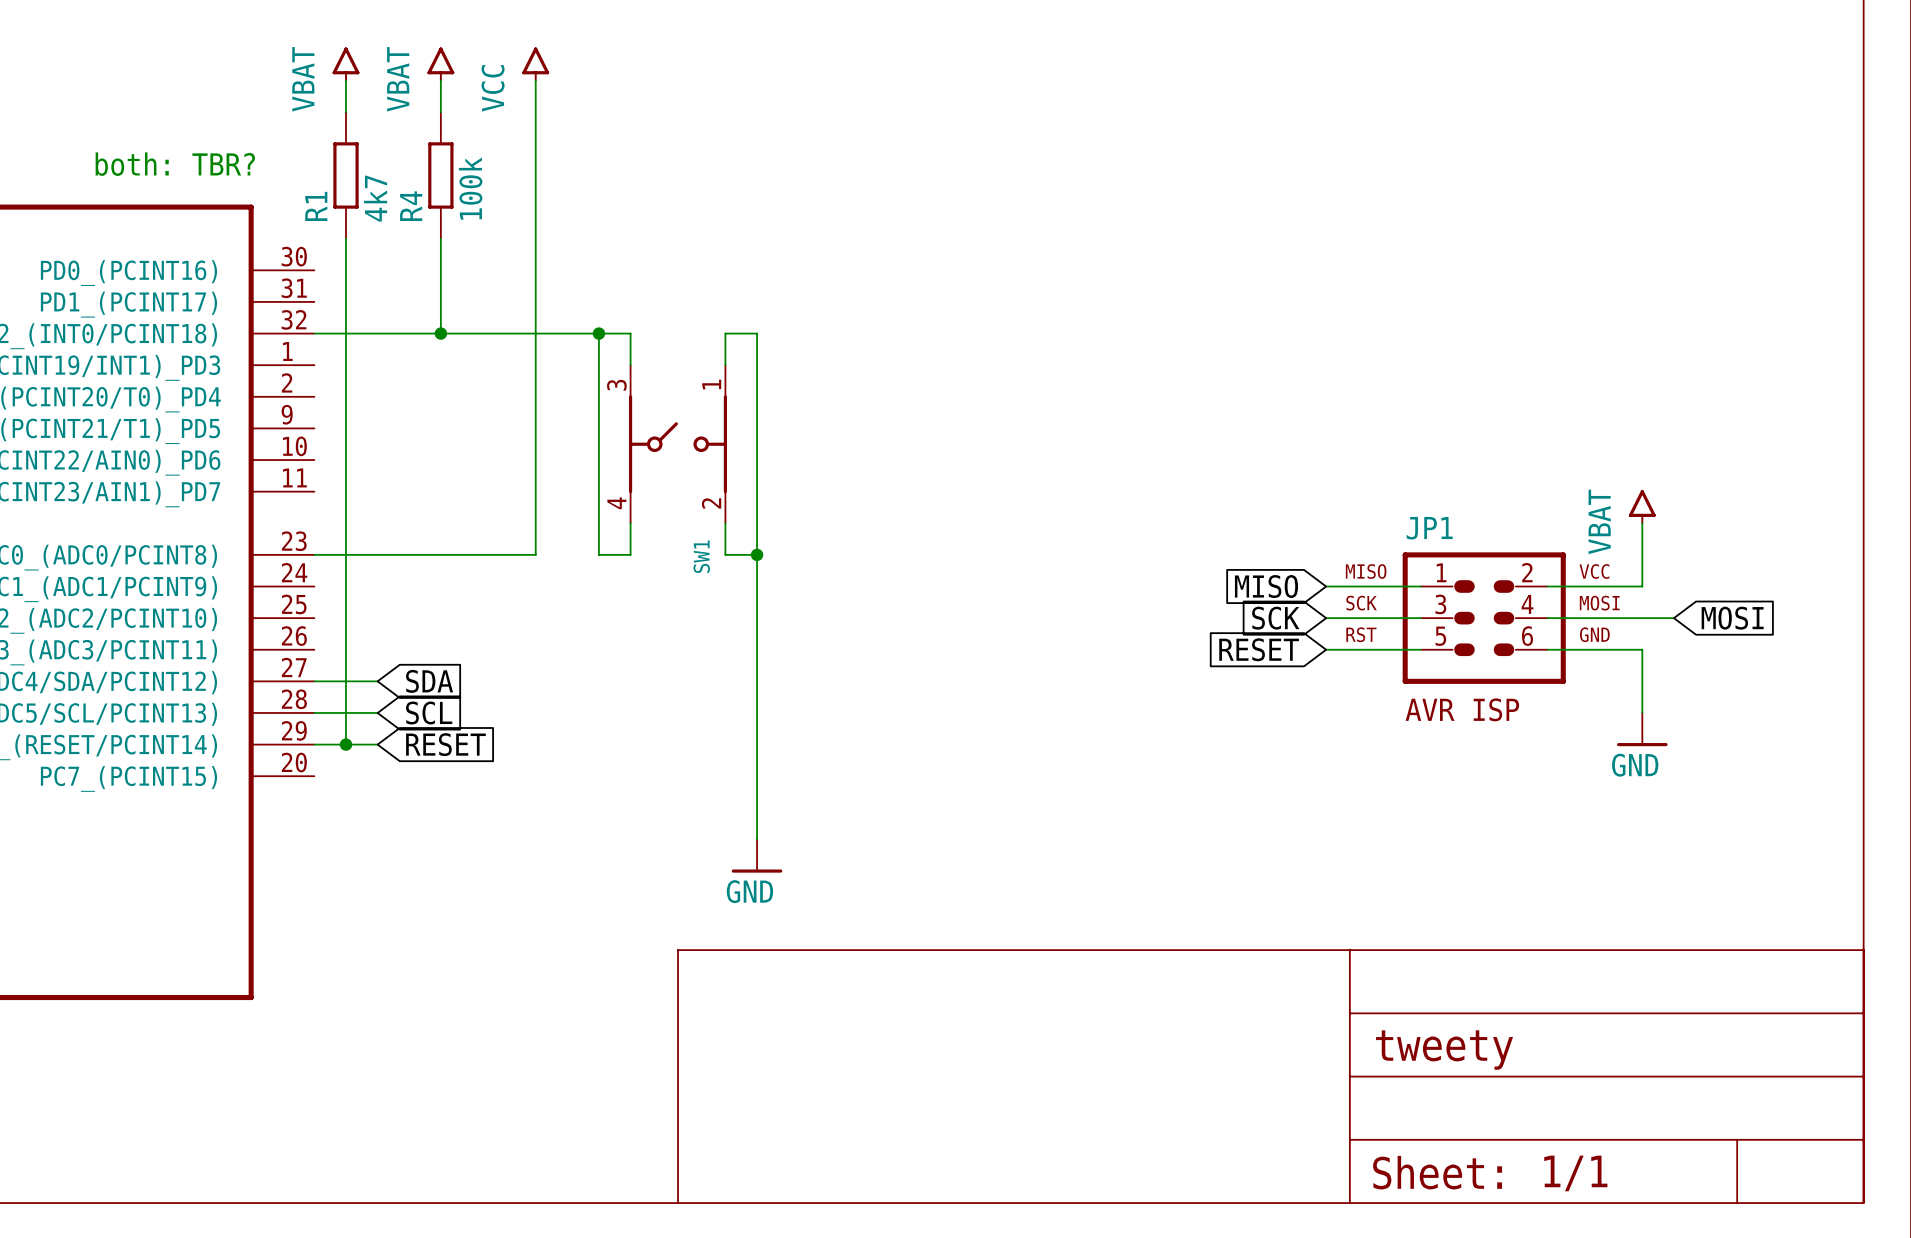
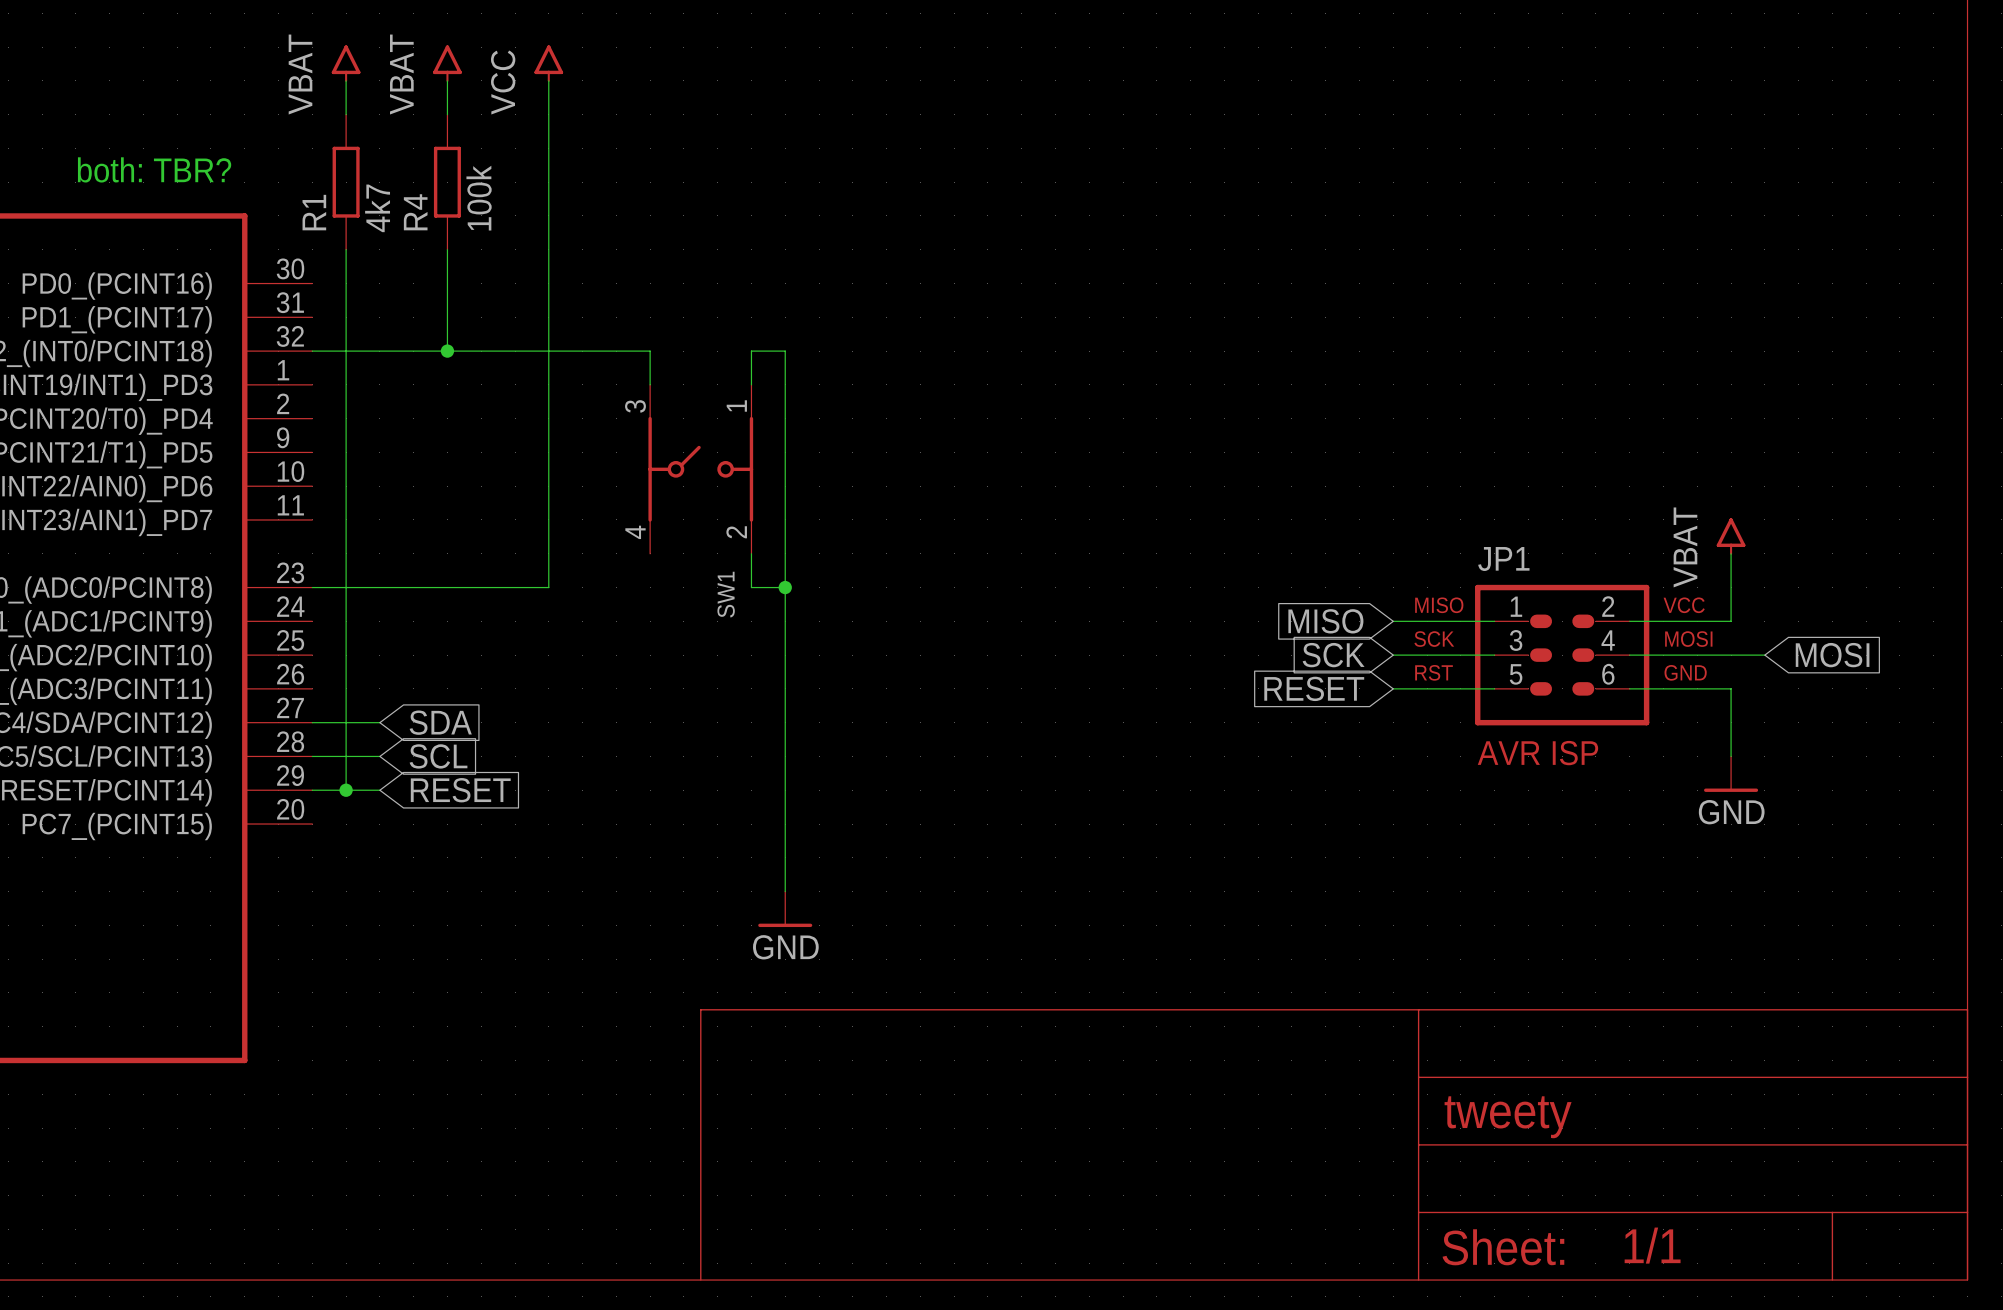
wire: (598, 333) (598, 554) (630, 554) (630, 523) -> none
junction: (598, 333) -> none

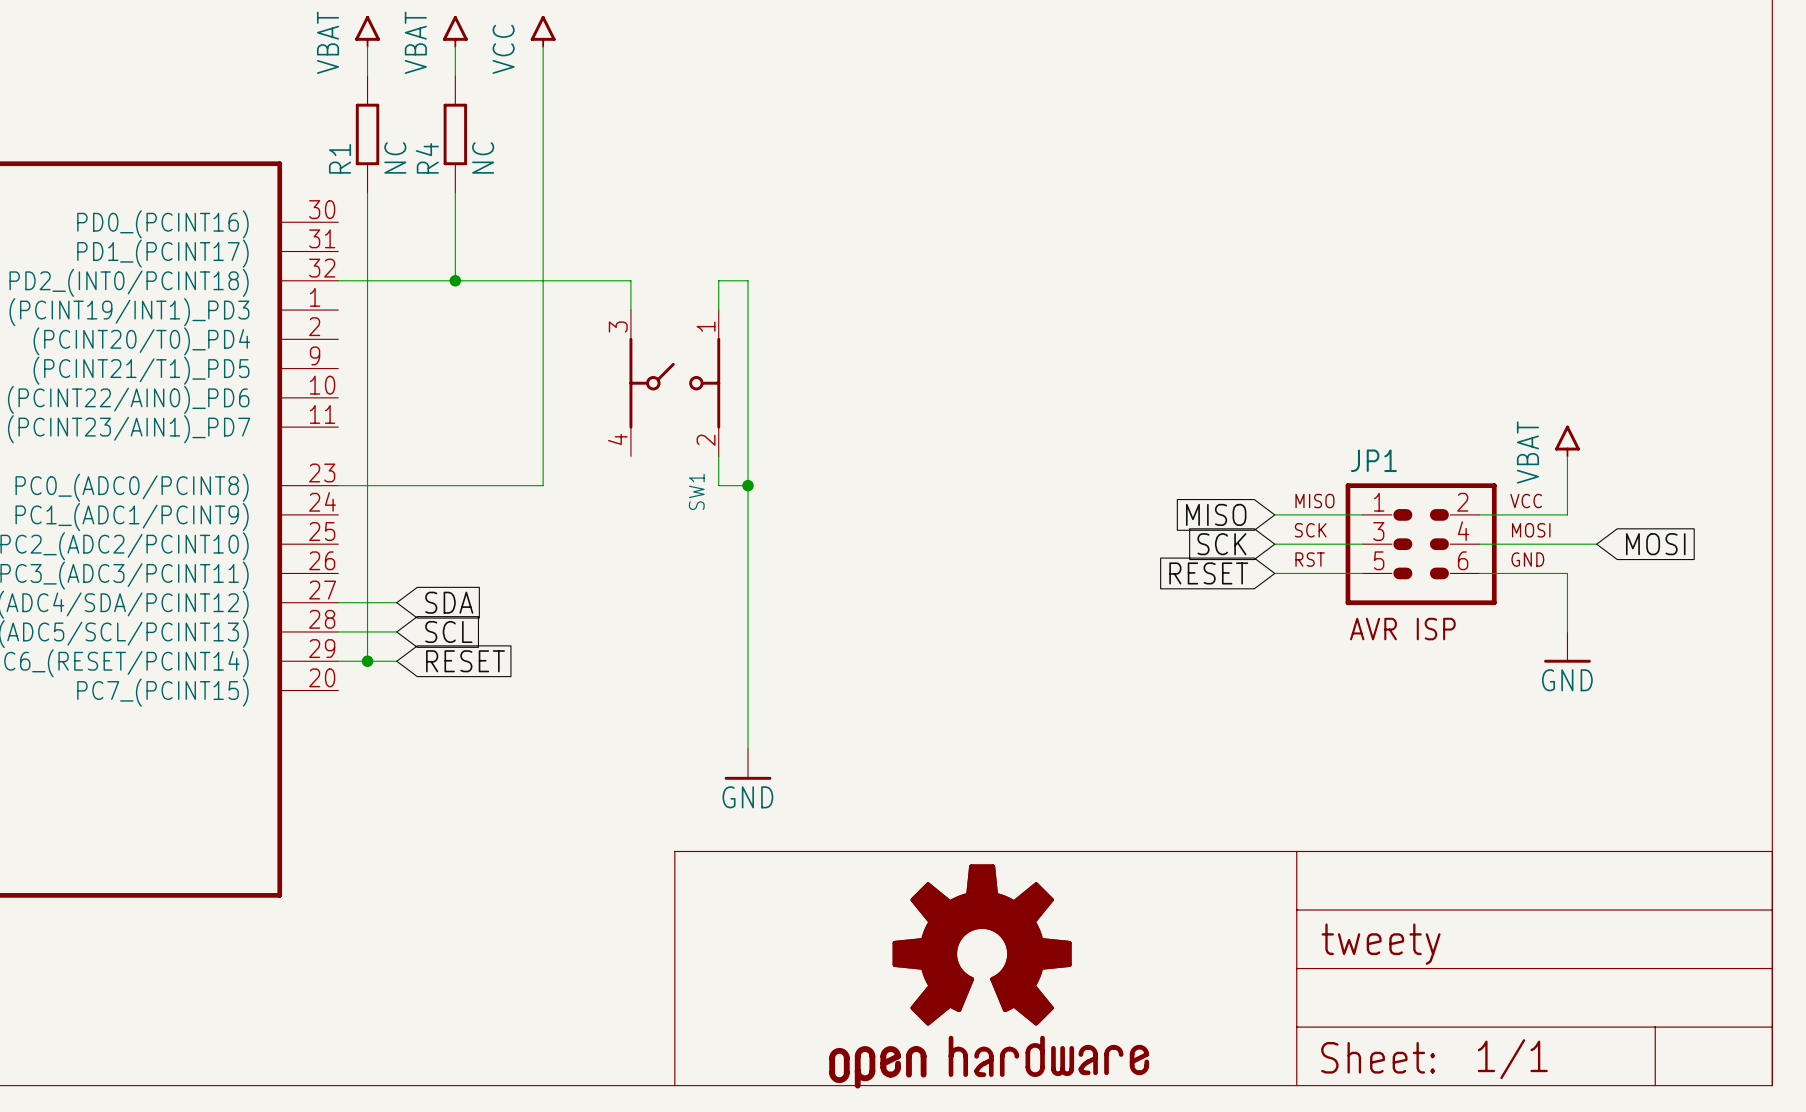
text: both: TBR? (154, 169) -> none
R4 value: 100k (479, 198) -> NC (483, 157)
R1 value: 4k7 (377, 208) -> NC (395, 157)
part: none -> (989, 976)

